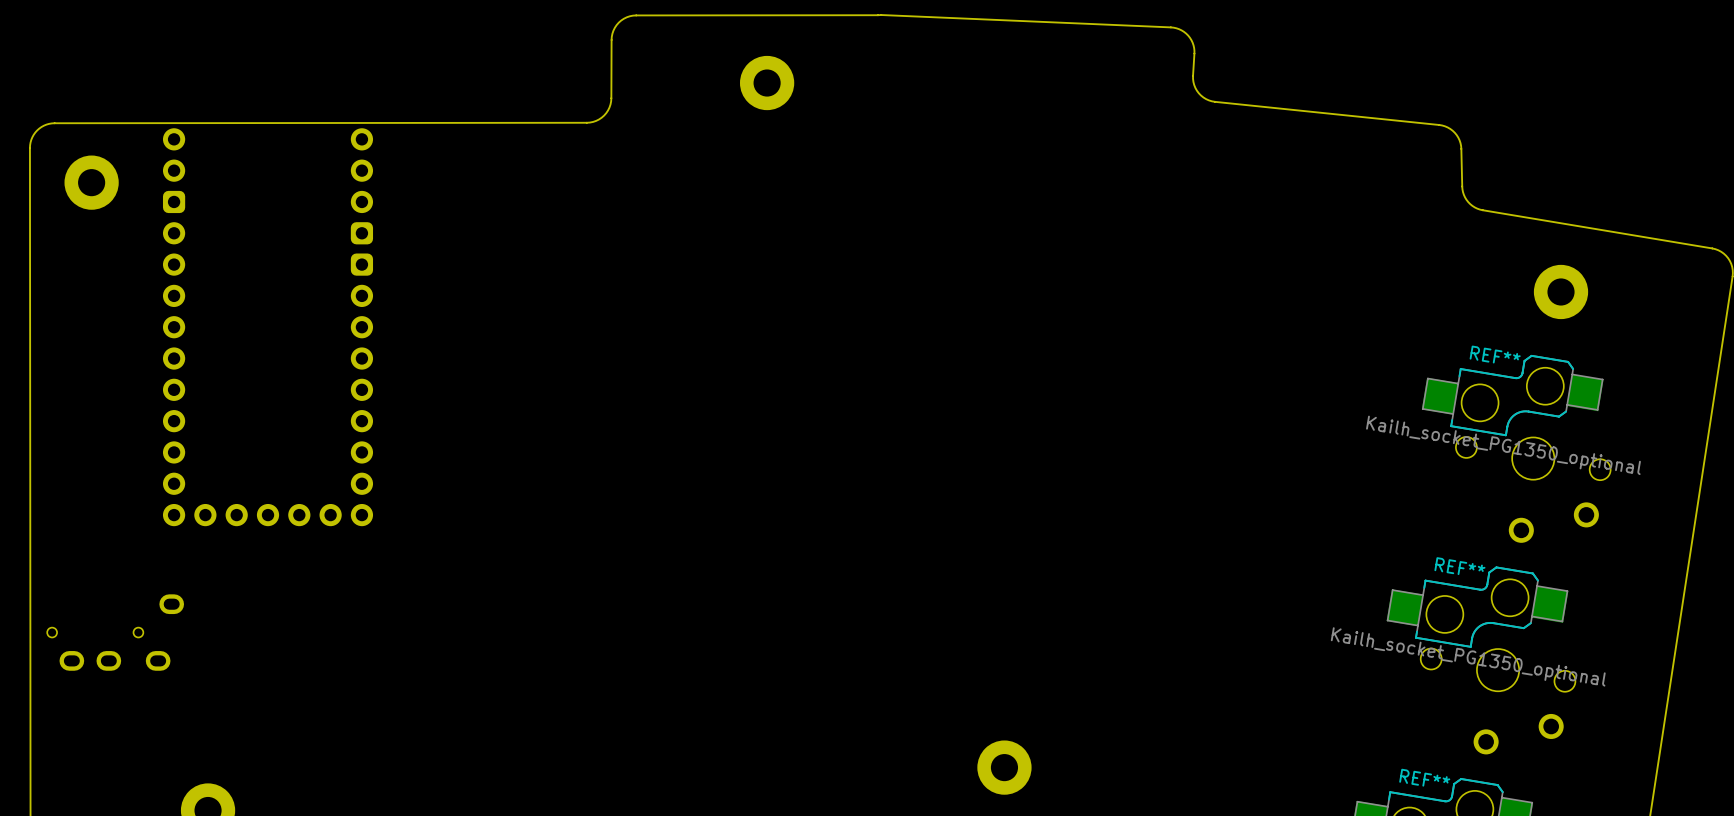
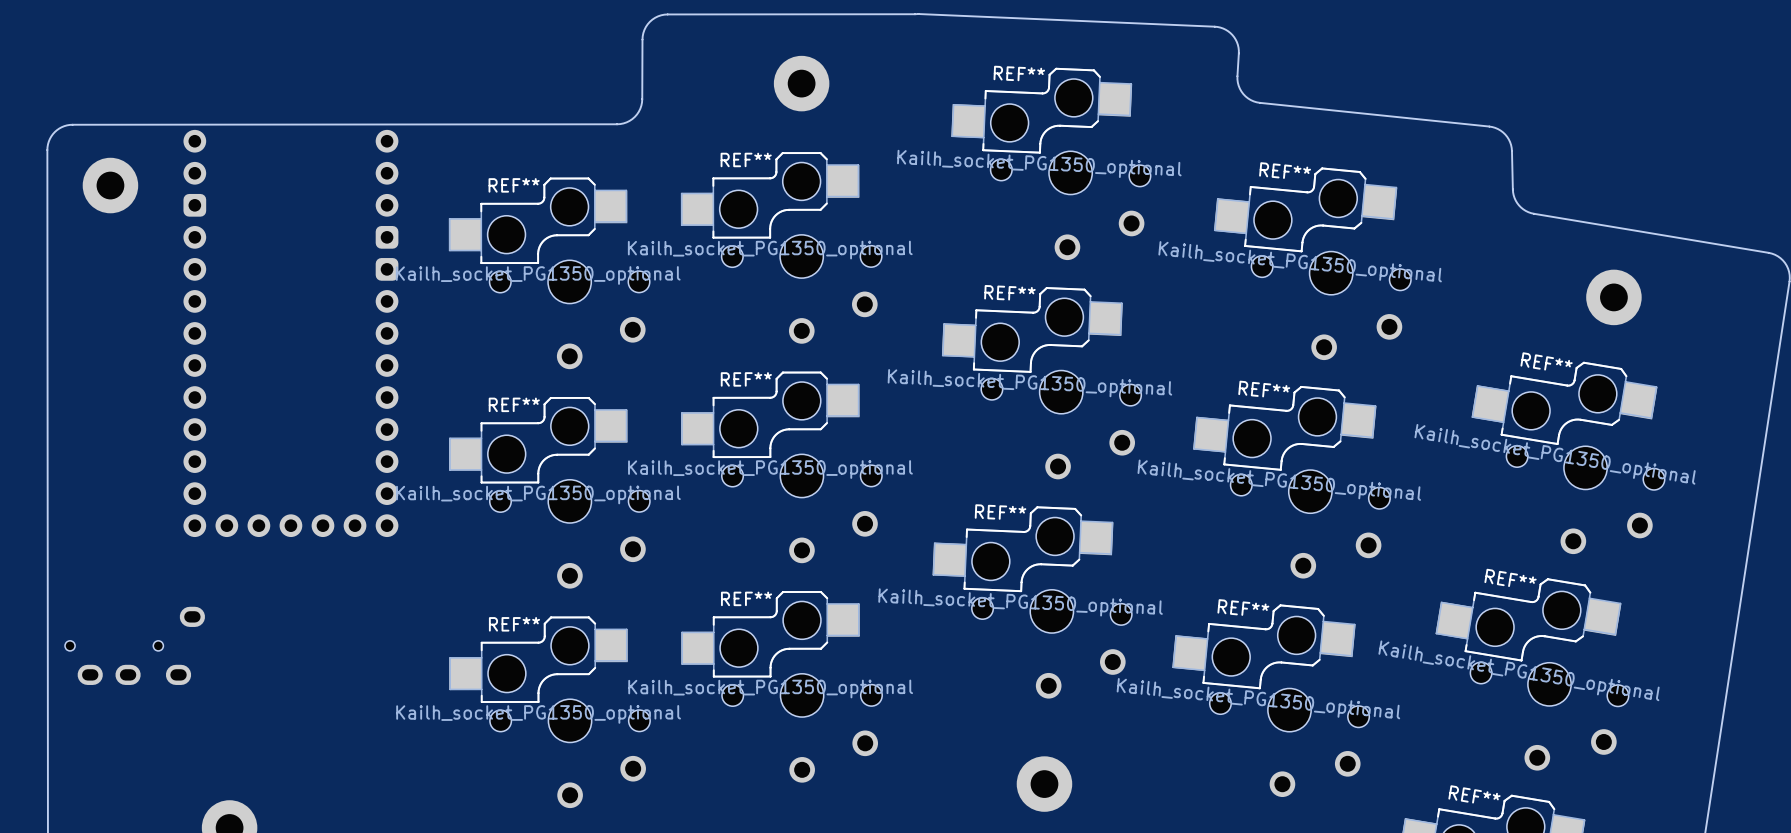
REF**: none -> Kailh_socket_PG1350_optional (1050, 163)
REF**: none -> Kailh_socket_PG1350_optional (781, 247)
REF**: none -> Kailh_socket_PG1350_optional (1312, 263)
REF**: none -> Kailh_socket_PG1350_optional (549, 273)
REF**: none -> Kailh_socket_PG1350_optional (1041, 383)
REF**: none -> Kailh_socket_PG1350_optional (781, 467)
REF**: none -> Kailh_socket_PG1350_optional (1291, 482)
REF**: none -> Kailh_socket_PG1350_optional (549, 492)
REF**: none -> Kailh_socket_PG1350_optional (1032, 602)
REF**: none -> Kailh_socket_PG1350_optional (781, 686)
REF**: none -> Kailh_socket_PG1350_optional (1270, 700)
REF**: none -> Kailh_socket_PG1350_optional (549, 712)

